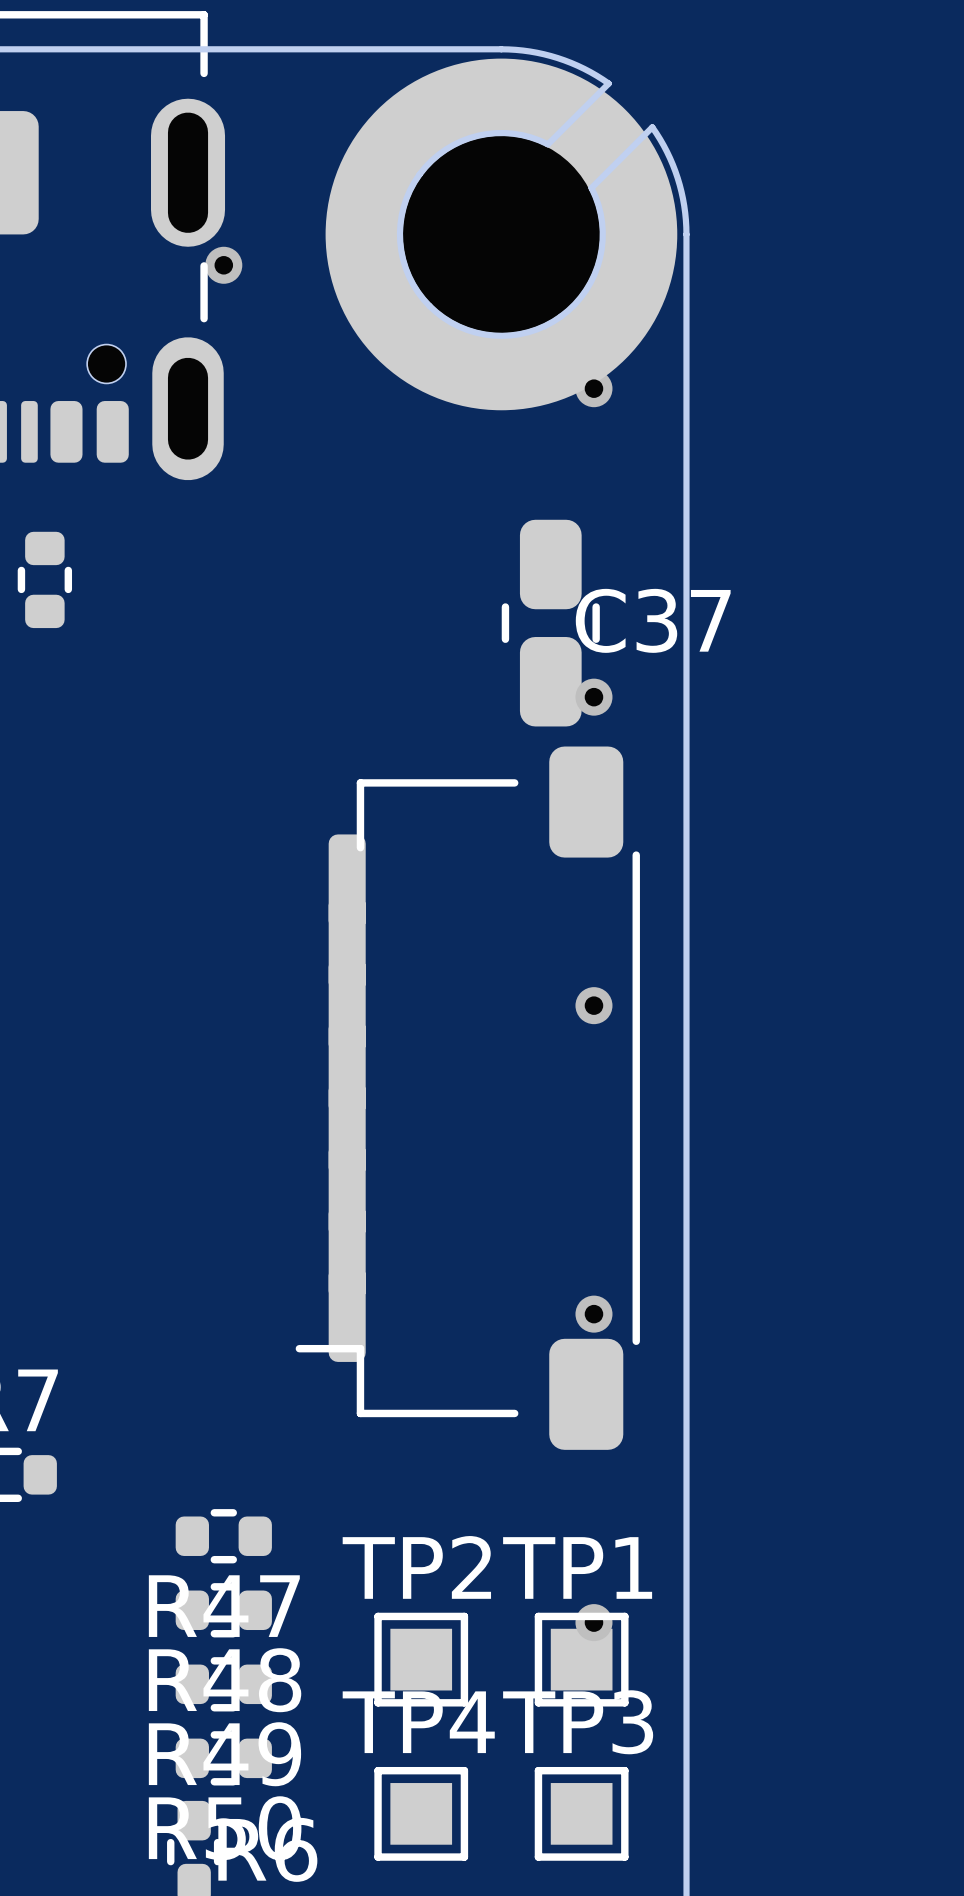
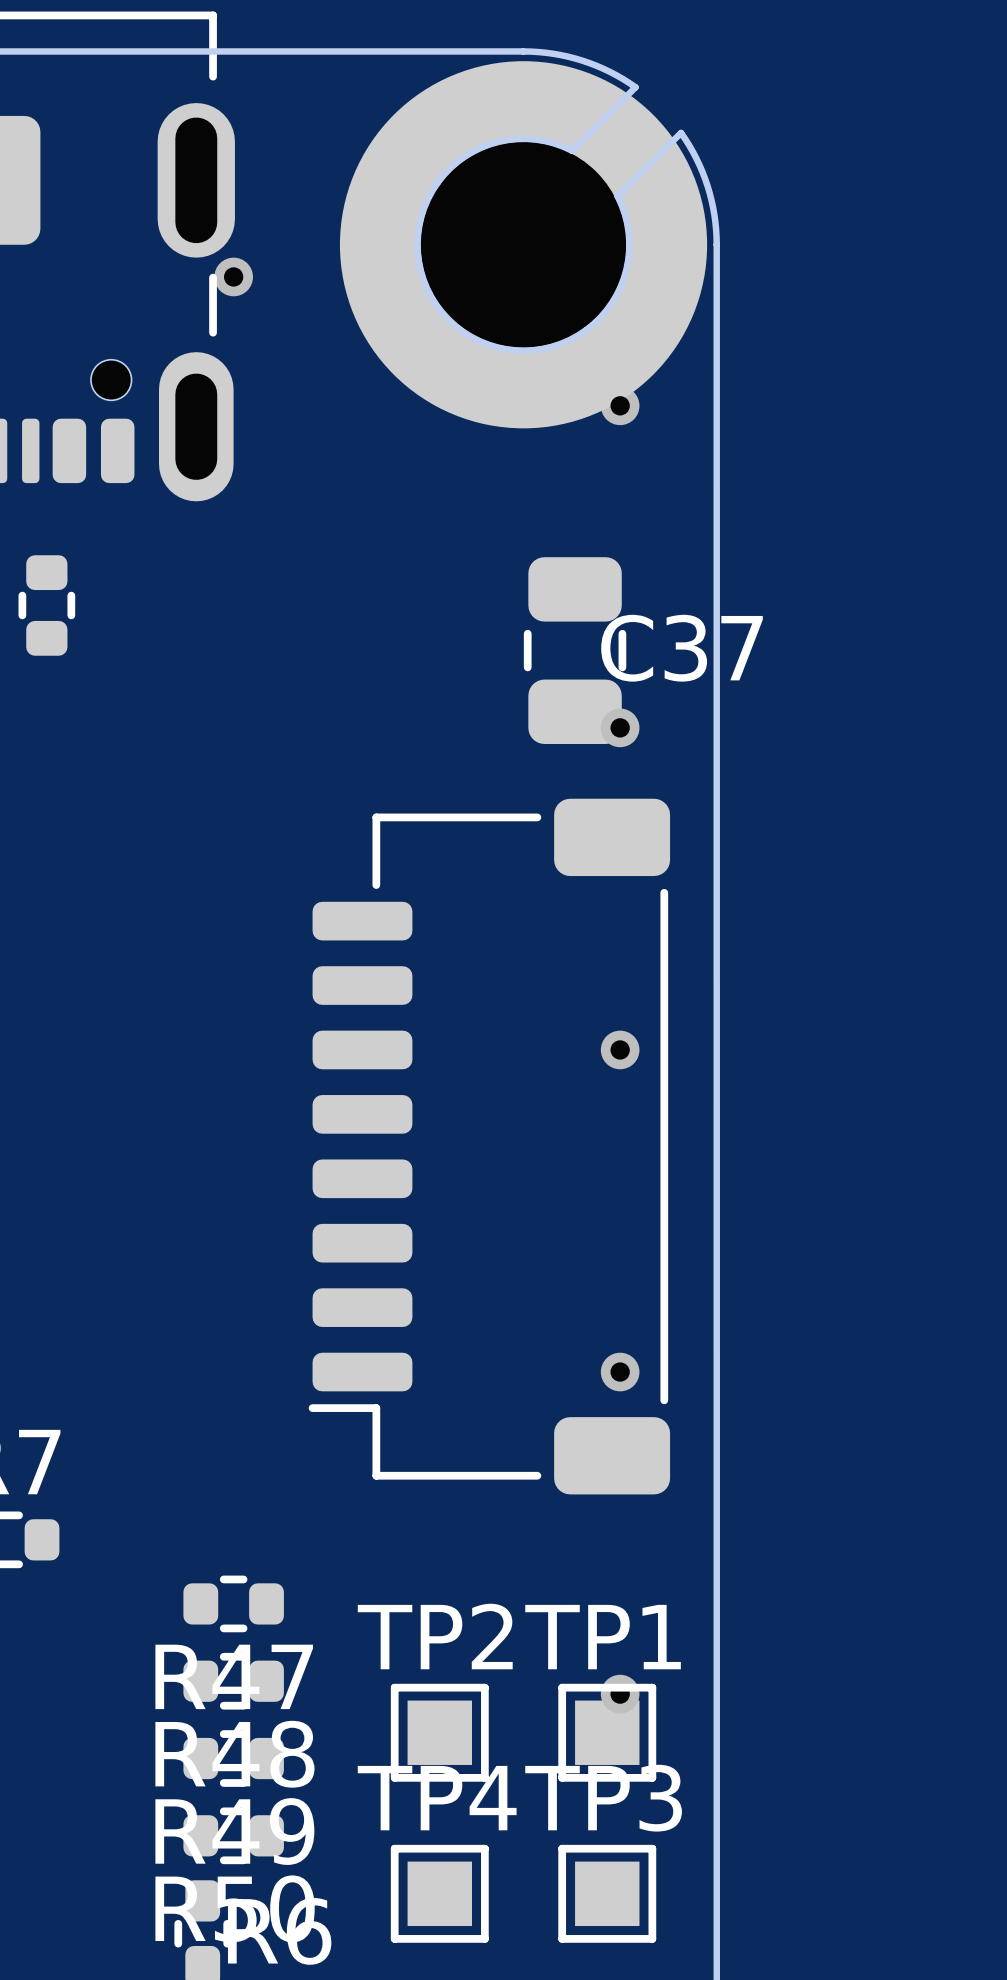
C37 footprint: [501, 519, 600, 727] -> [523, 557, 627, 744]
part footprint: [295, 746, 640, 1450] -> [308, 798, 671, 1495]

